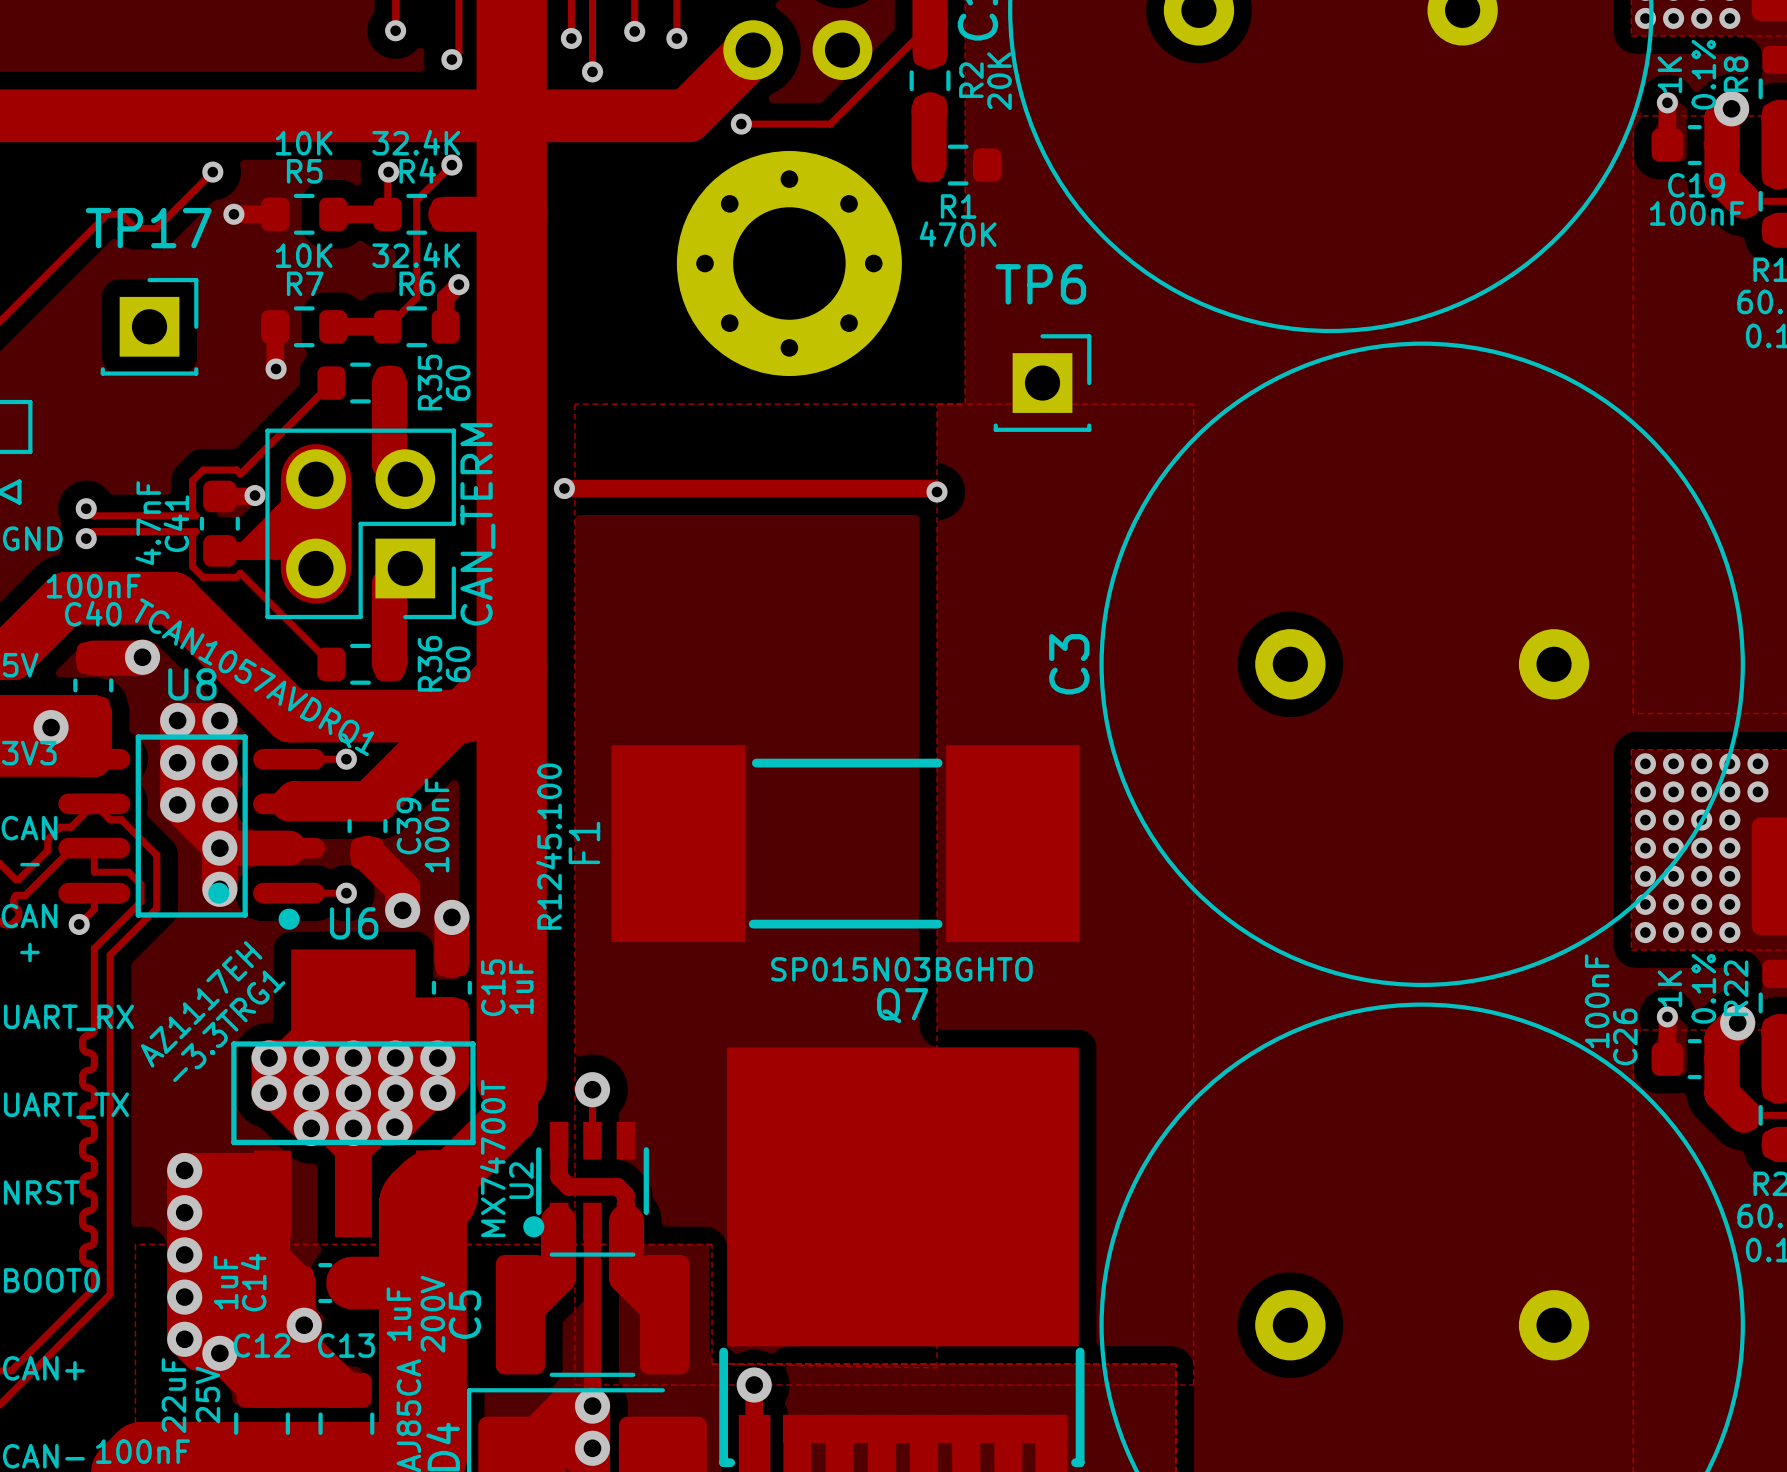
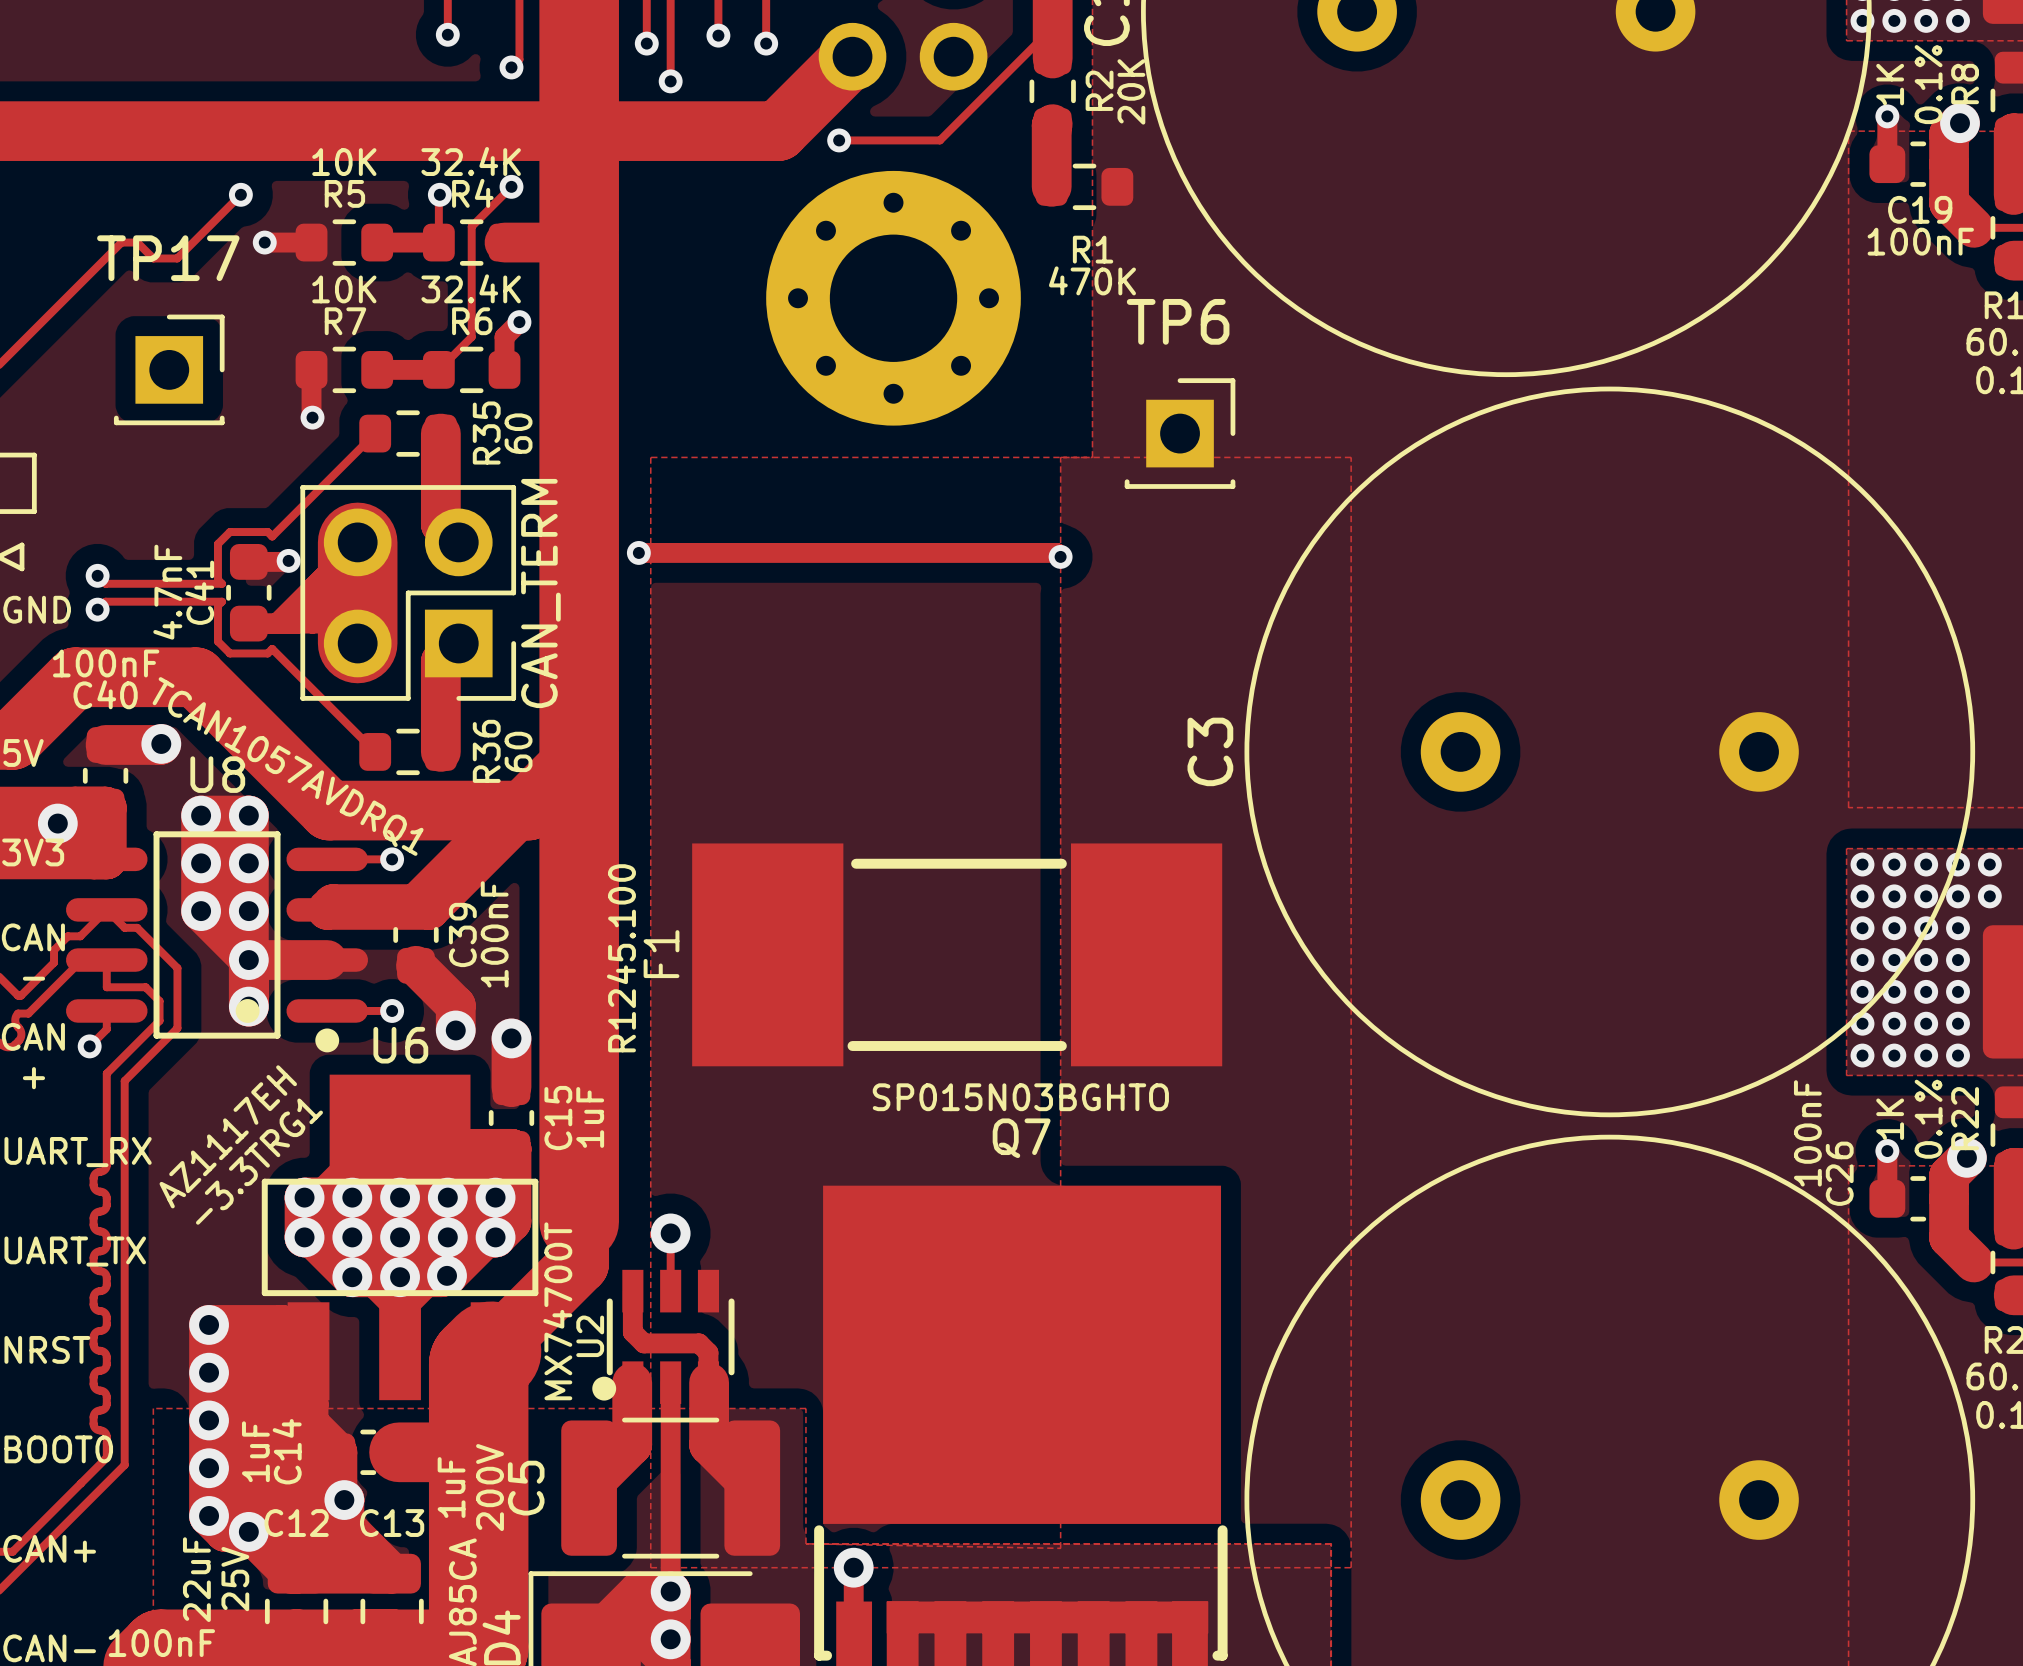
R1 name position: R1 (958, 206) -> R1 (1093, 249)
text position: 470K (958, 234) -> 470K (1092, 280)

